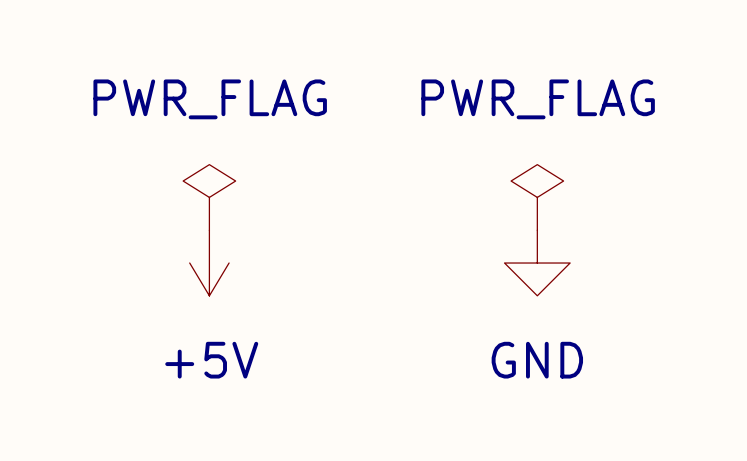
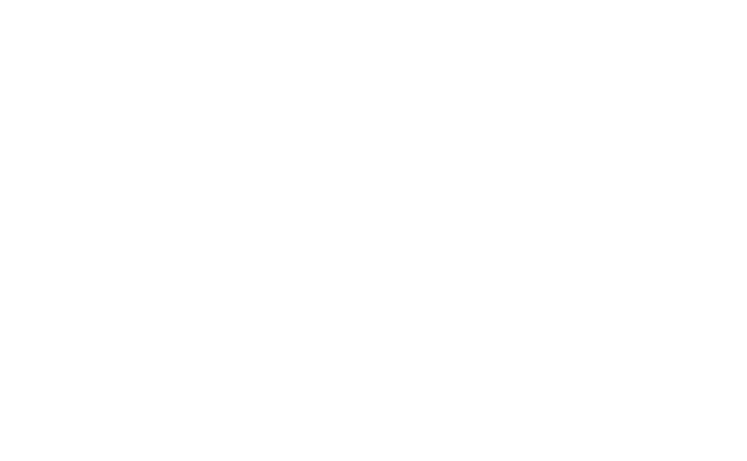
power symbol: PWR_FLAG (209, 197) -> none
power symbol: PWR_FLAG (537, 197) -> none
power symbol: +5V (209, 263) -> none
power symbol: GND (537, 263) -> none

